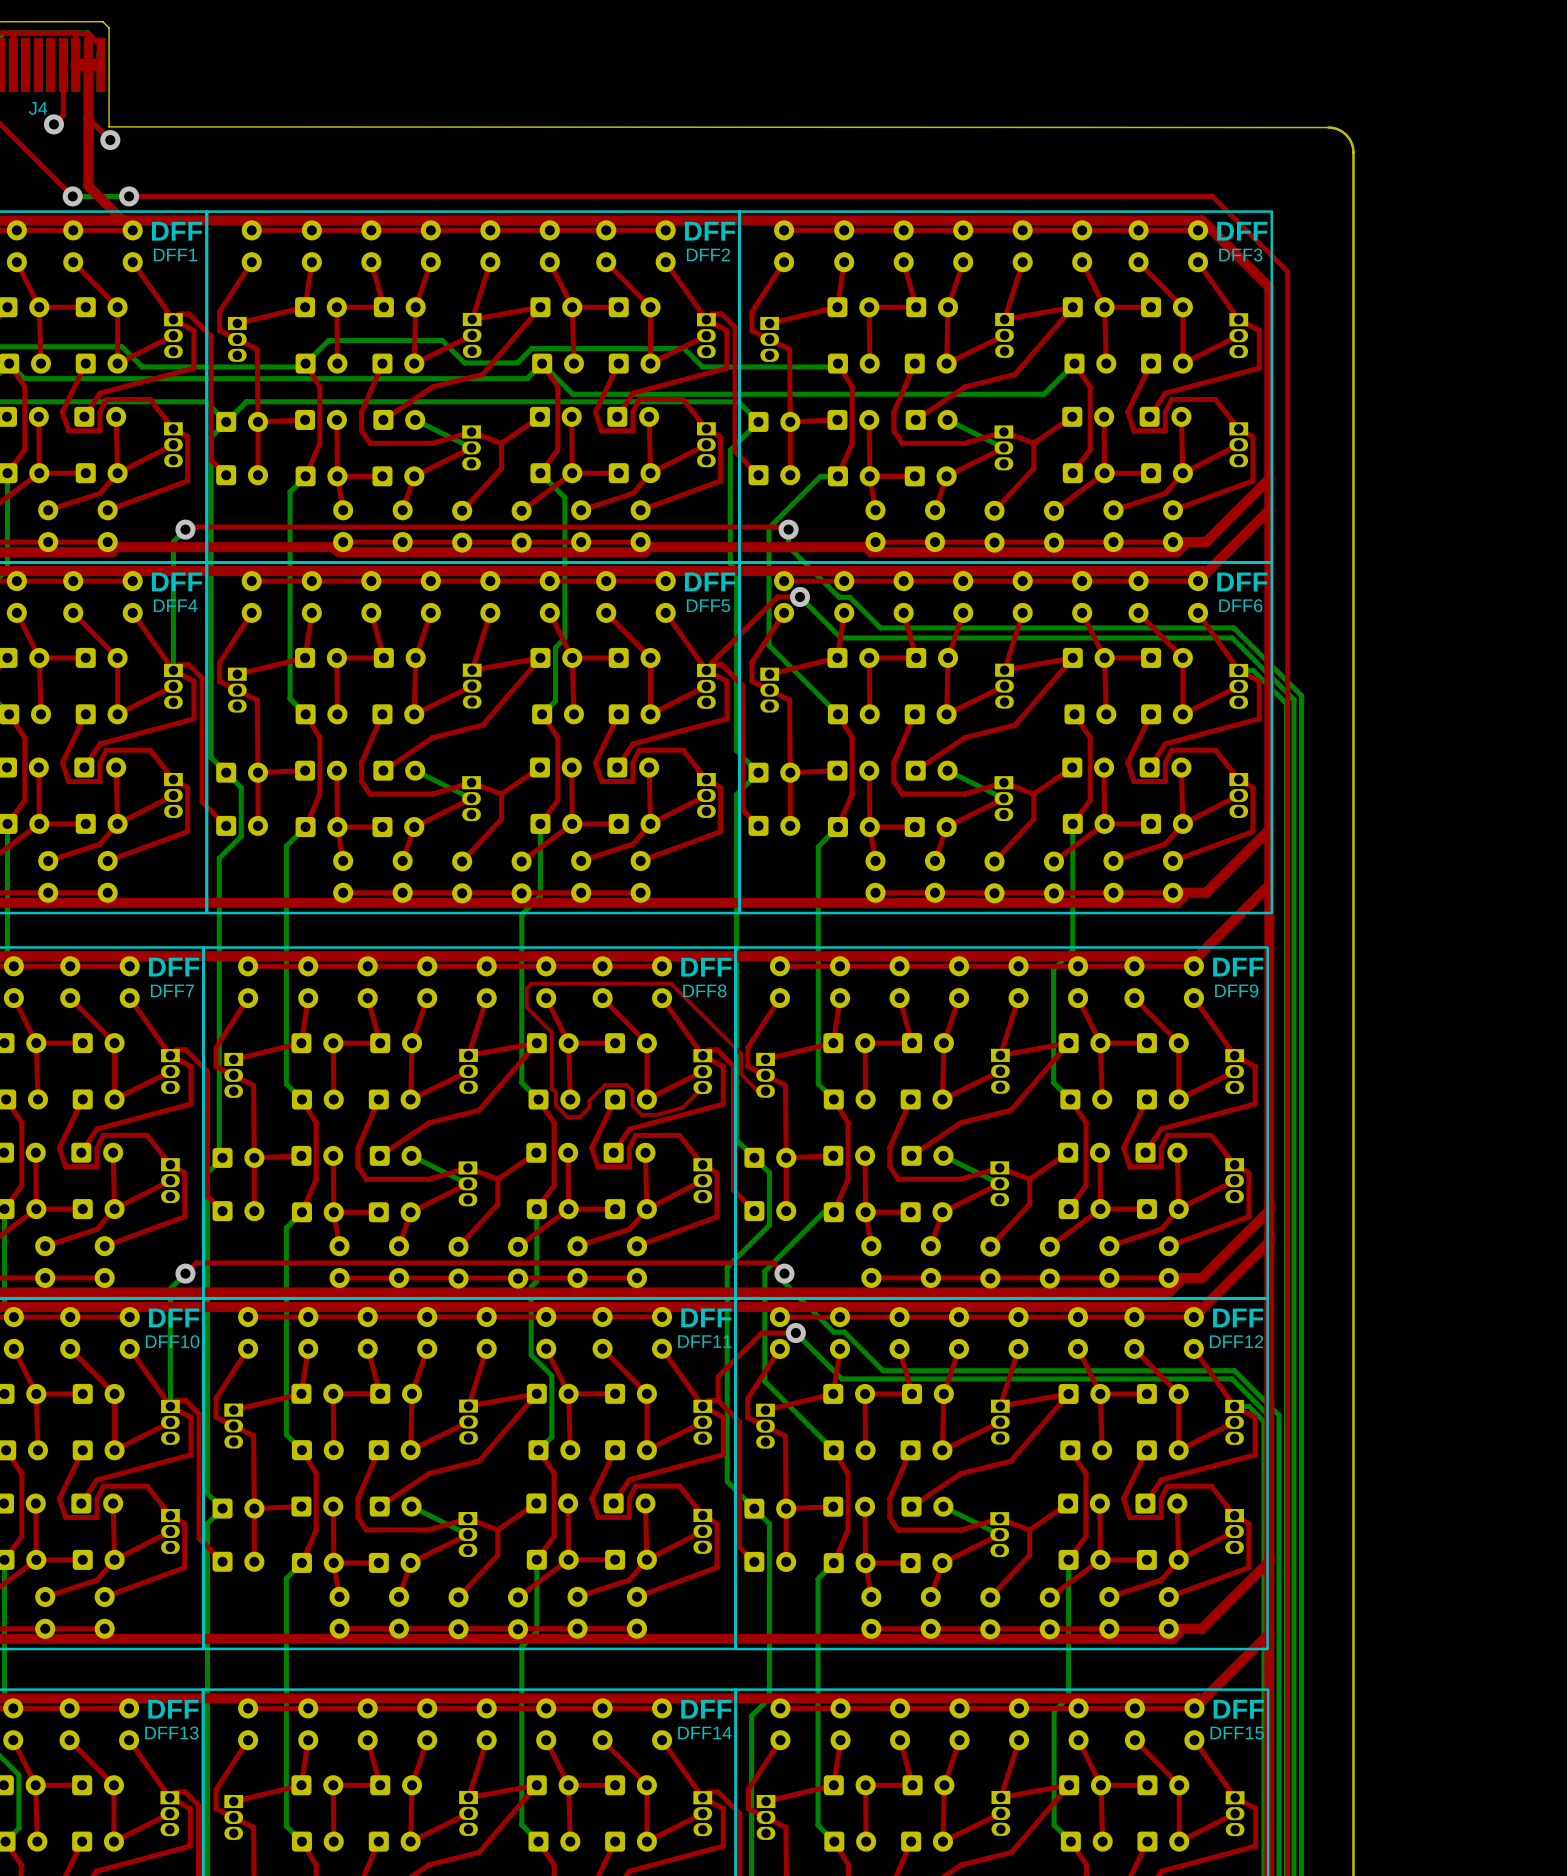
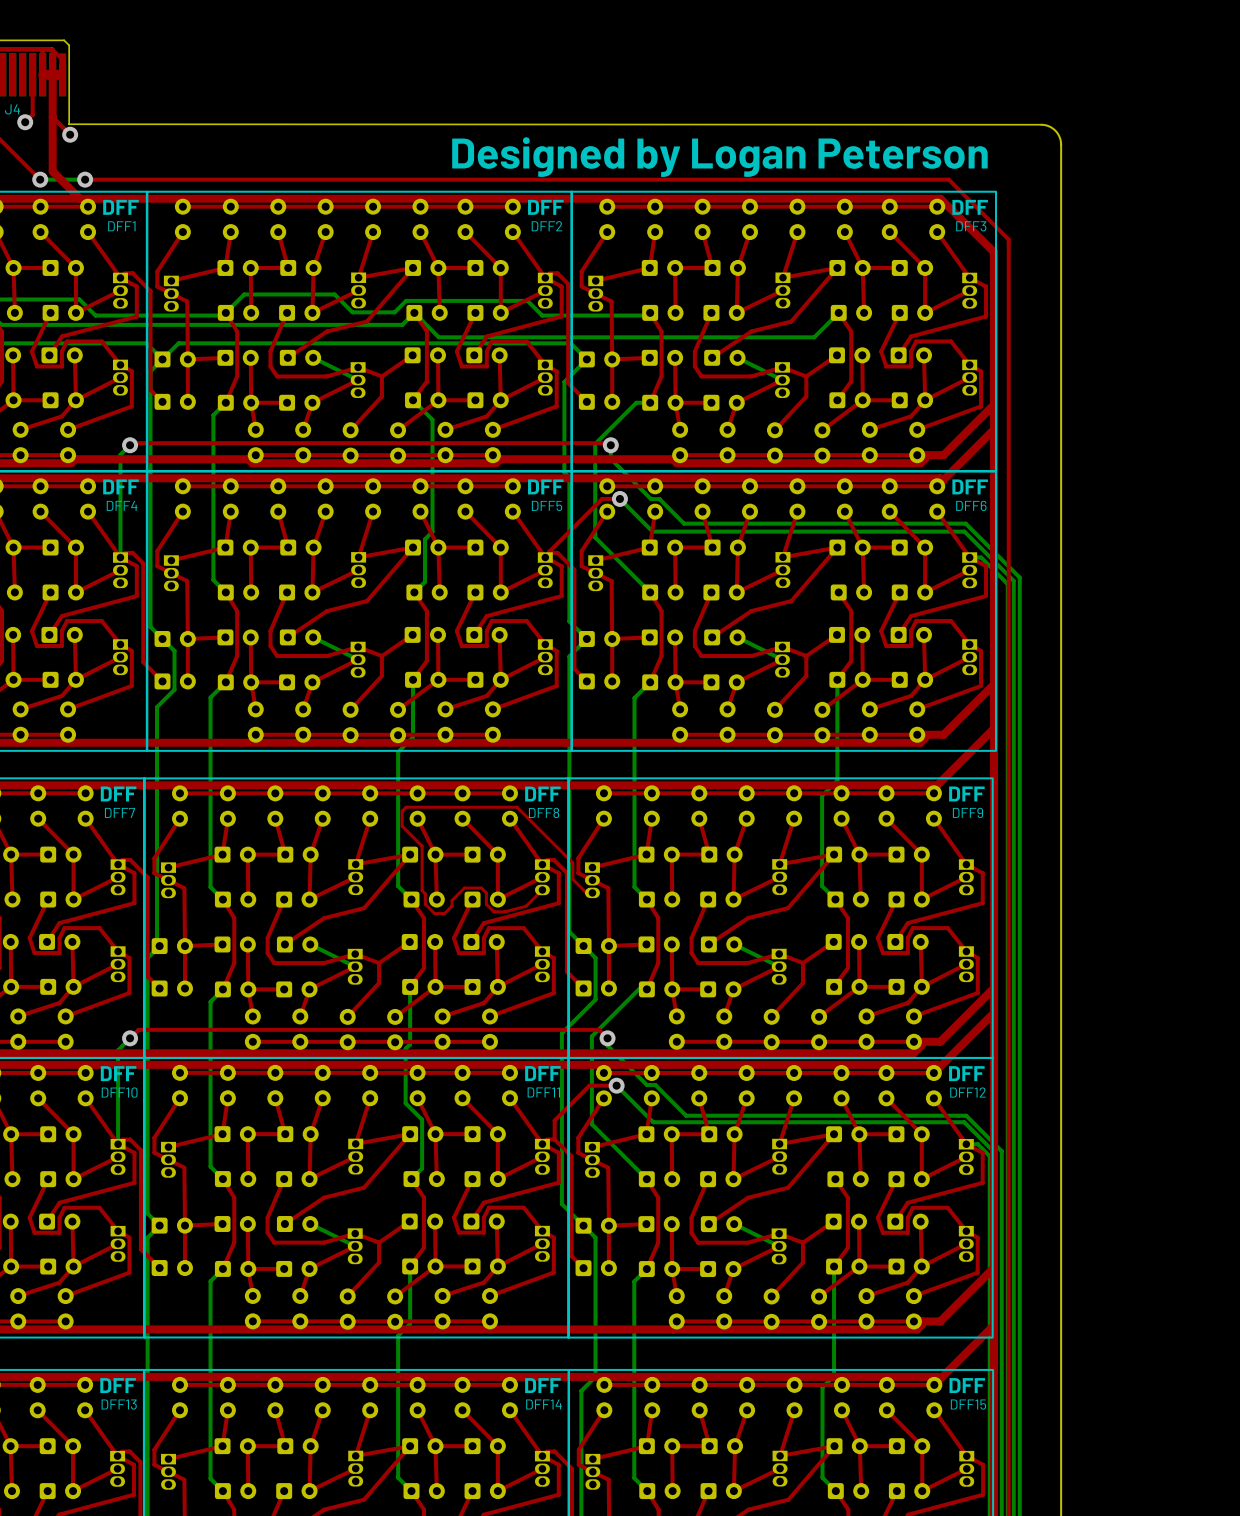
text: none -> Designed by Logan Peterson (719, 157)

